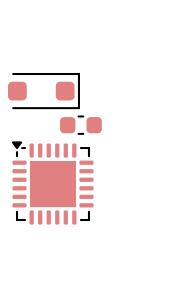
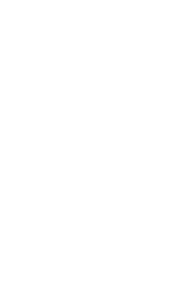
part: (43, 91) -> none
part: (80, 125) -> none
part: (52, 182) -> none

